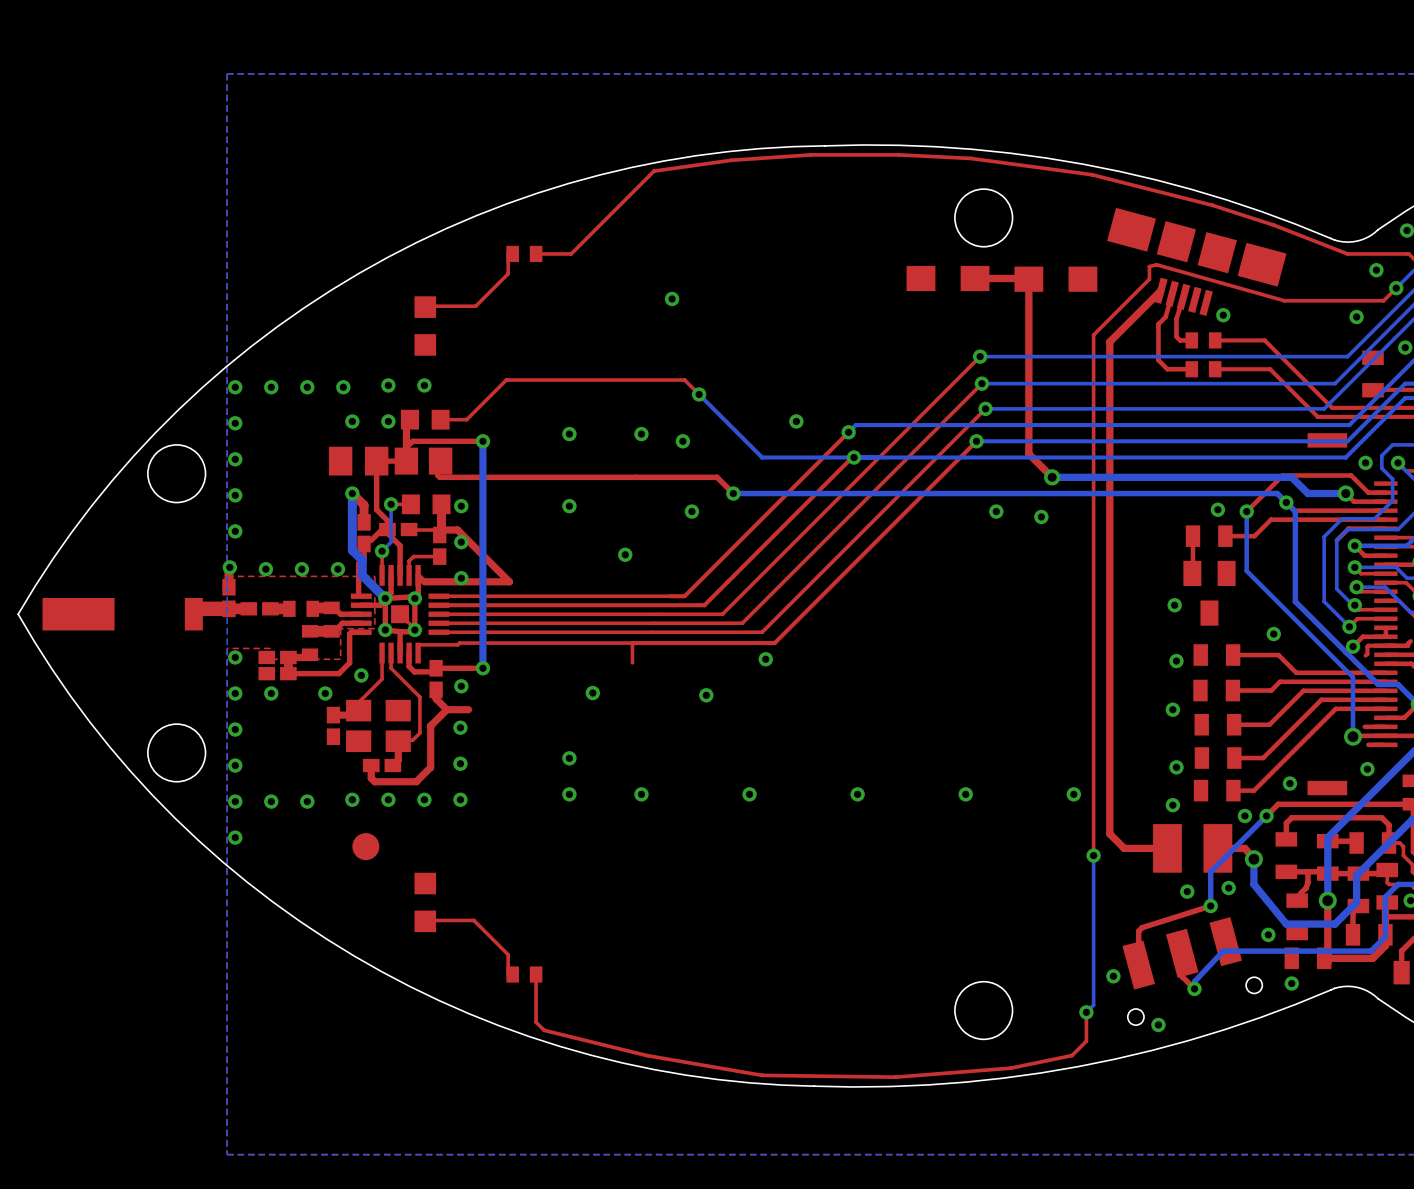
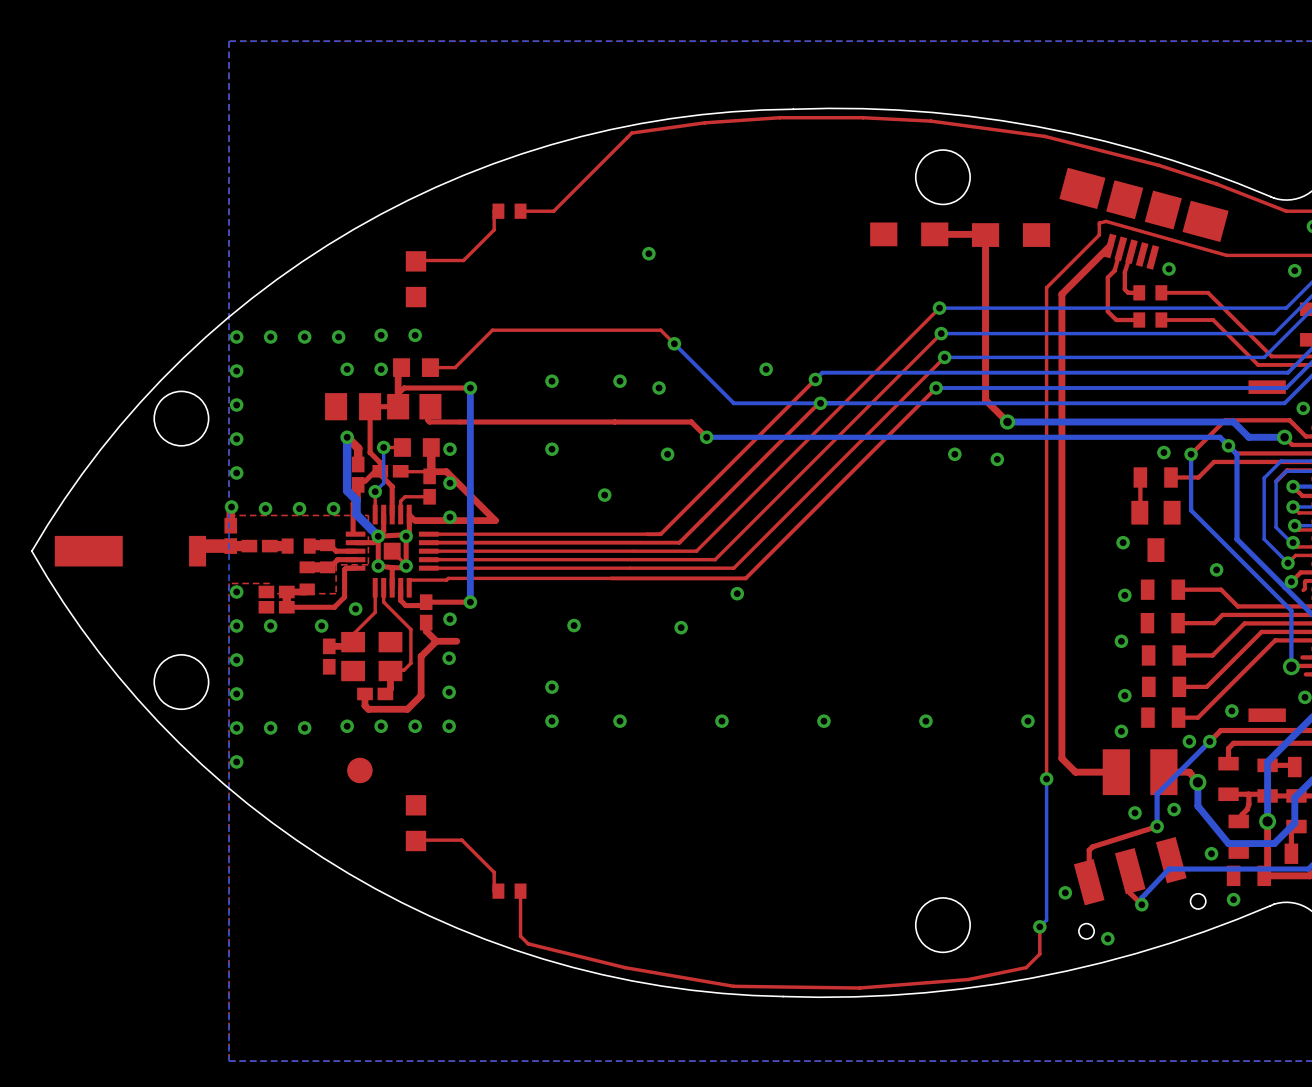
top track: (632, 643) (632, 662) -> none

